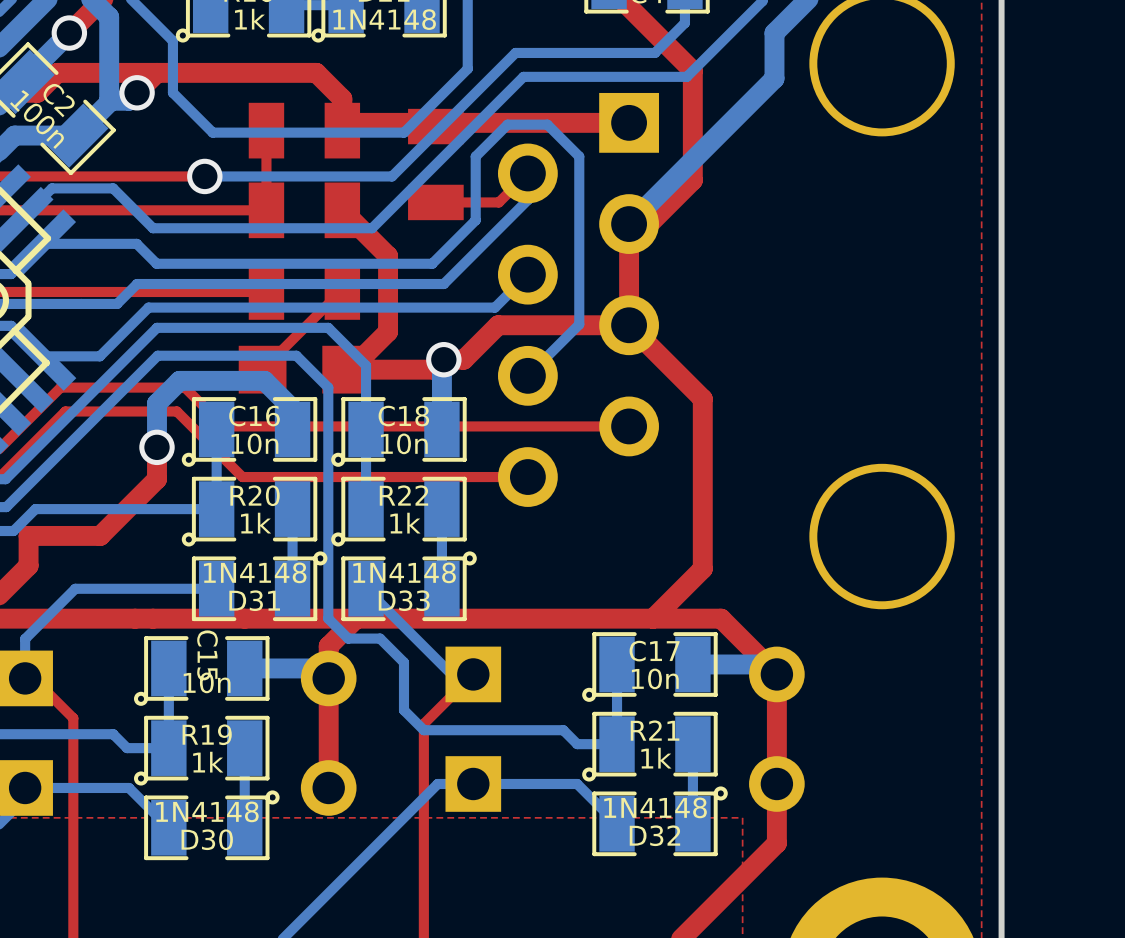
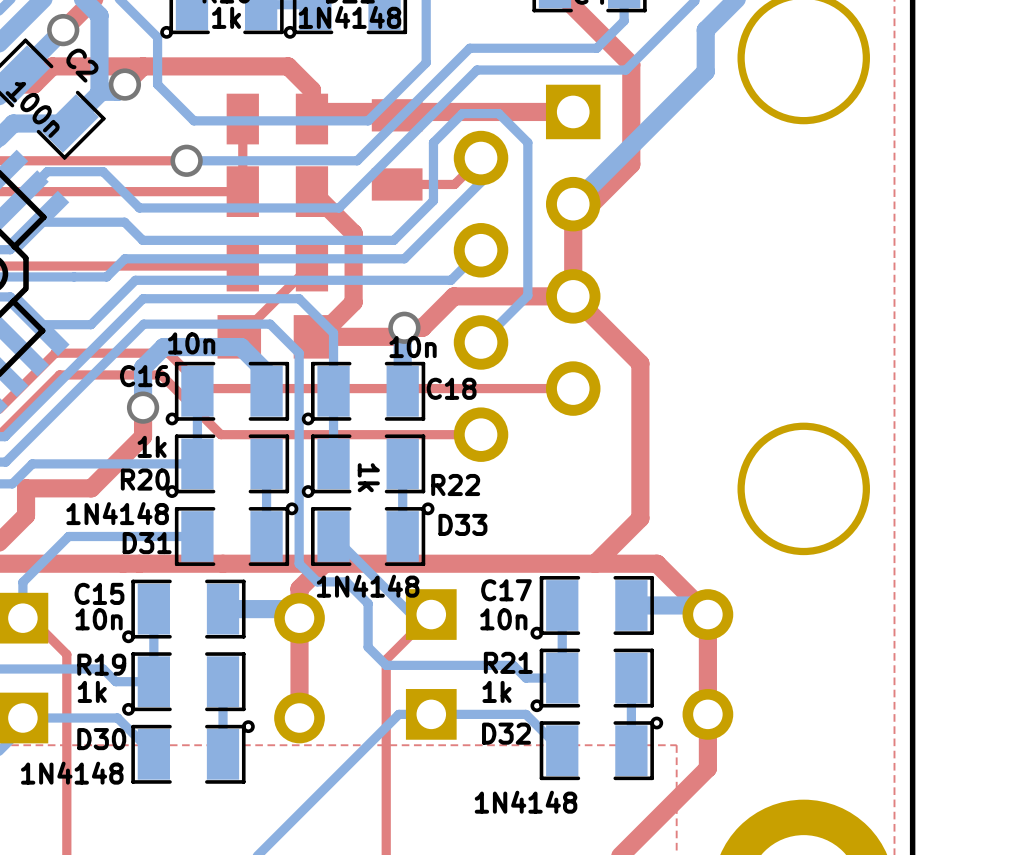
C2 name position: C2 (59, 100) -> C2 (82, 65)
C16 name position: C16 (254, 416) -> C16 (144, 376)
C18 name position: C18 (403, 416) -> C18 (451, 388)
C16 value position: 10n (254, 443) -> 10n (191, 343)
C18 value position: 10n (404, 443) -> 10n (413, 347)
R20 name position: R20 (255, 495) -> R20 (145, 479)
R22 name position: R22 (403, 495) -> R22 (455, 485)
R20 value position: 1k (256, 523) -> 1k (152, 446)
R22 value rotation: 0° (405, 523) -> 90° clockwise (368, 477)
D31 value position: 1N4148 (255, 572) -> 1N4148 (117, 513)
D33 value position: 1N4148 (404, 572) -> 1N4148 (368, 586)
D31 name position: D31 (254, 600) -> D31 (147, 543)
D33 name position: D33 (404, 600) -> D33 (462, 524)
C17 name position: C17 (654, 651) -> C17 (506, 590)
C15 name rotation: 0° (207, 655) -> 90° counterclockwise (99, 593)
C15 name position: C15 (207, 655) -> C15 (99, 593)
C17 value position: 10n (655, 678) -> 10n (503, 619)
C15 value position: 10n (207, 682) -> 10n (99, 619)
R21 name position: R21 (655, 730) -> R21 (508, 662)
R19 name position: R19 (207, 734) -> R19 (101, 664)
R21 value position: 1k (656, 758) -> 1k (496, 691)
R19 value position: 1k (208, 762) -> 1k (92, 691)
D32 value position: 1N4148 (655, 807) -> 1N4148 (526, 802)
D30 value position: 1N4148 (207, 811) -> 1N4148 (72, 773)
D32 name position: D32 (654, 835) -> D32 (506, 733)
D30 name position: D30 (207, 839) -> D30 (101, 739)

